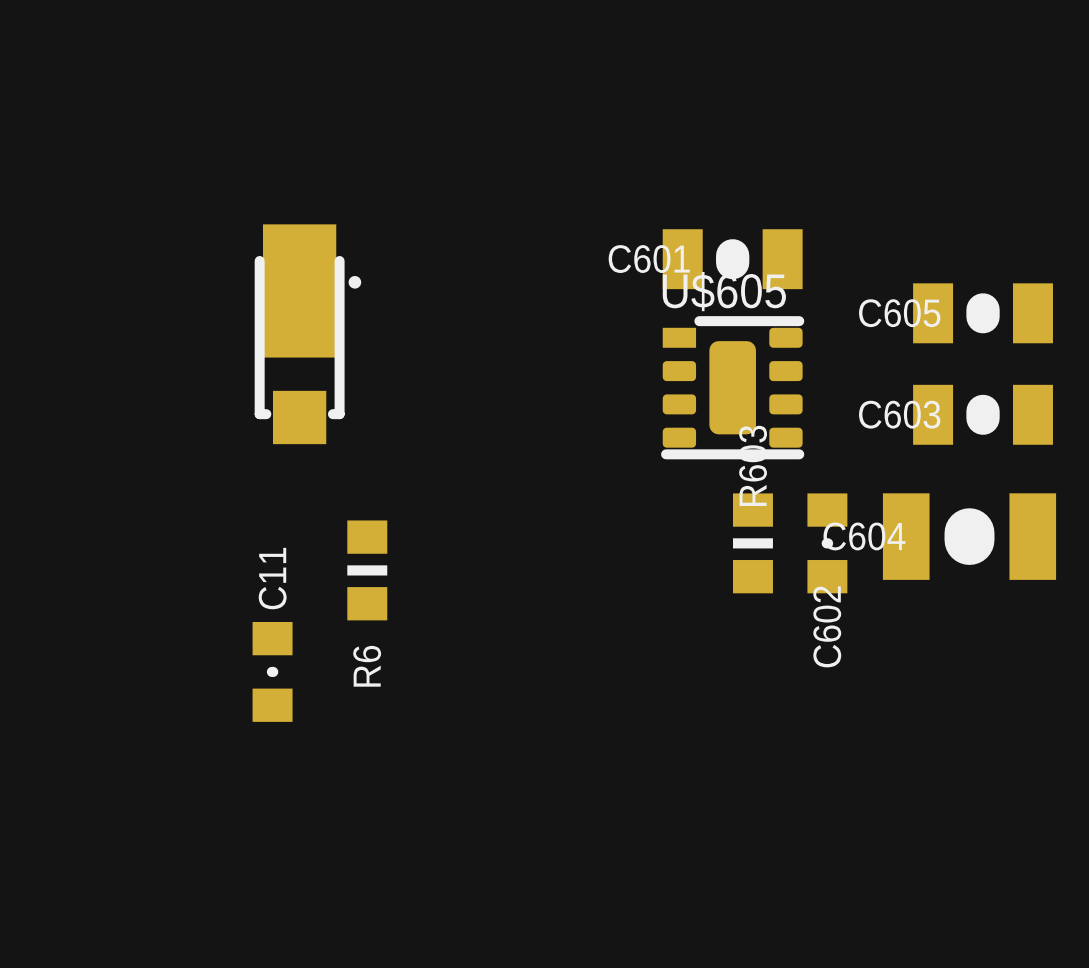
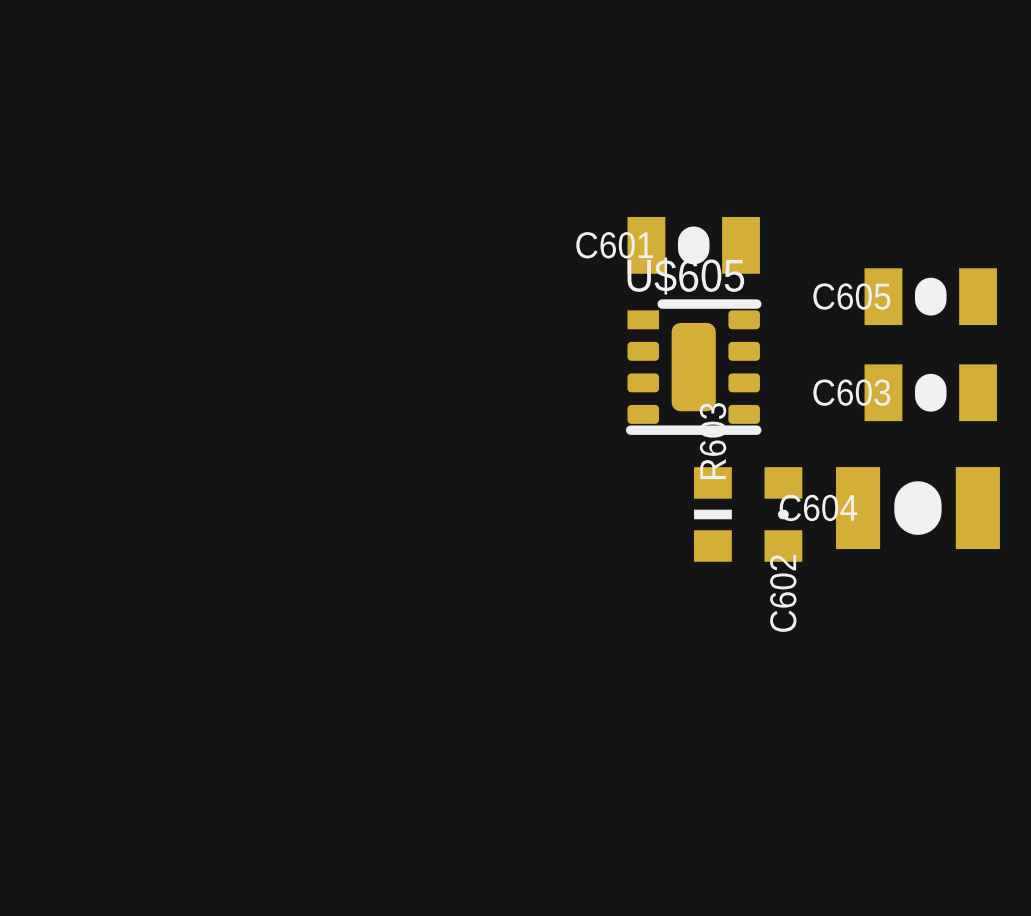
part: (307, 334) -> none
R6: (367, 570) -> none
C11: (272, 671) -> none

